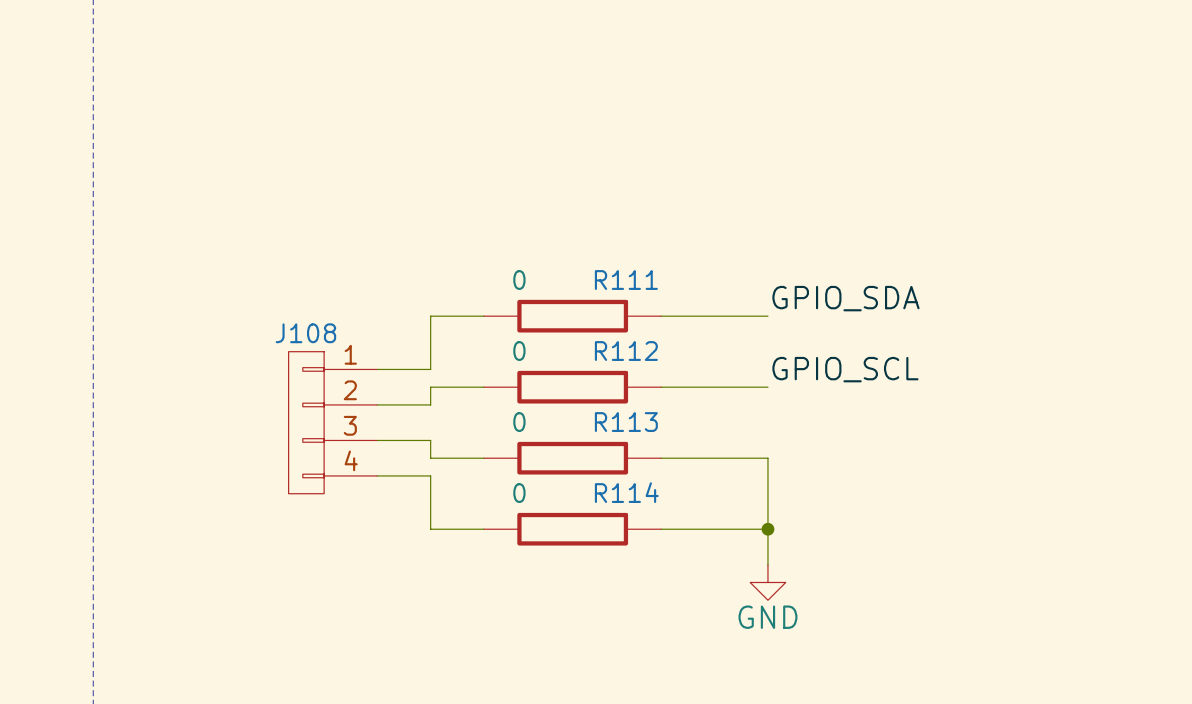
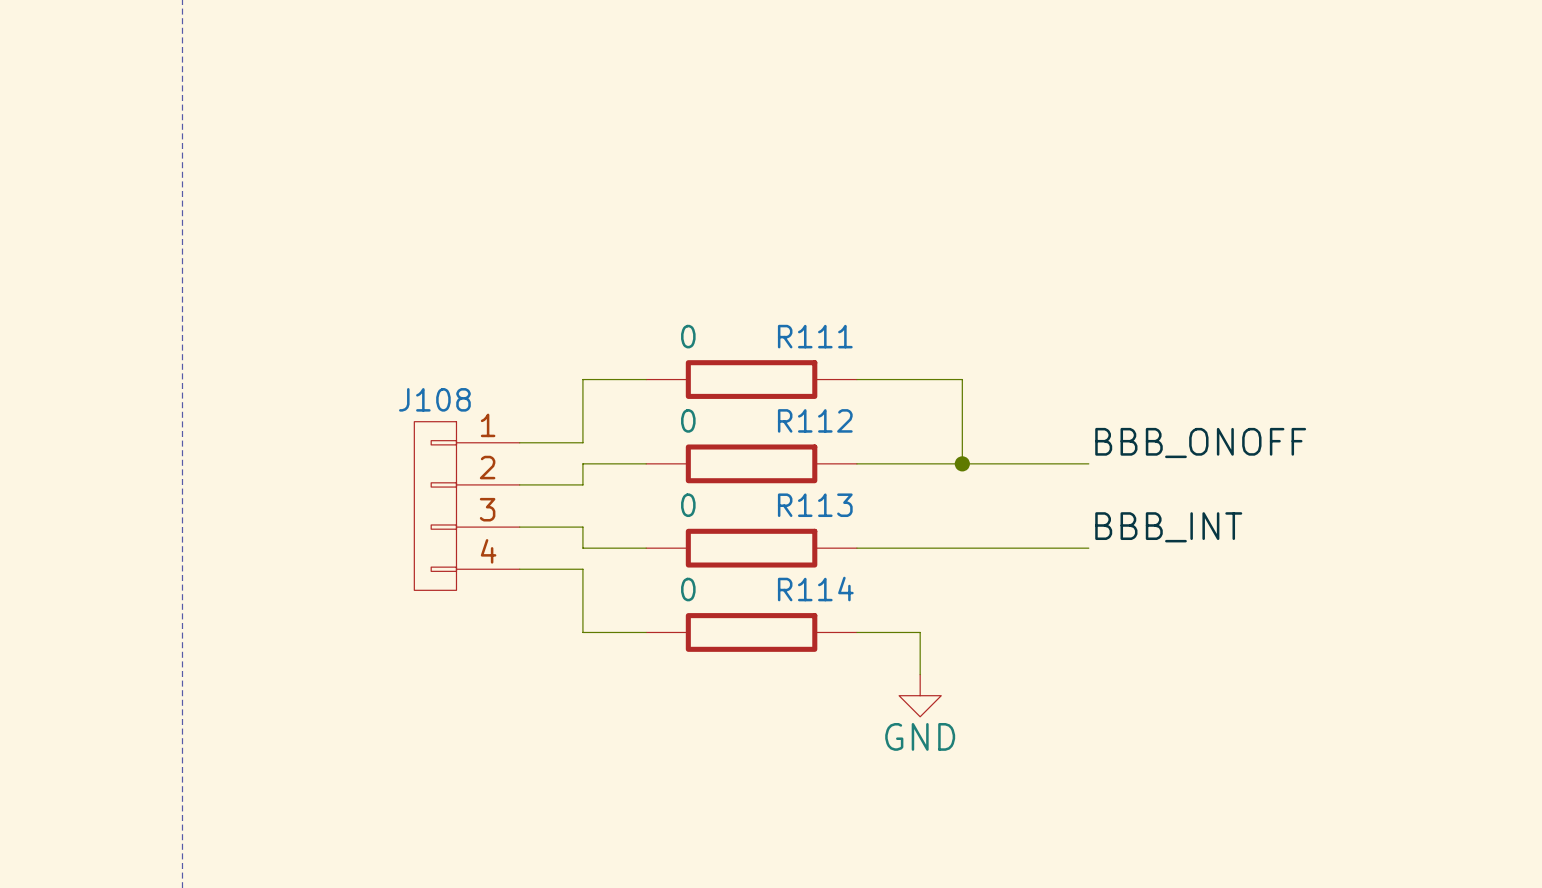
label: GPIO_SDA (845, 298) -> none
wire: (750, 316) (767, 316) -> (962, 379) (962, 463)
label: GPIO_SCL (845, 369) -> none
label: none -> BBB_ONOFF (1200, 443)
junction: none -> (962, 463)
wire: none -> (983, 463) (1088, 463)
label: none -> BBB_INT (1168, 527)
wire: (767, 458) (767, 564) -> (983, 548) (1088, 548)
wire: (714, 529) (767, 529) -> (920, 632) (920, 674)
junction: (767, 529) -> none
power symbol position: GND (767, 582) -> GND (920, 695)

